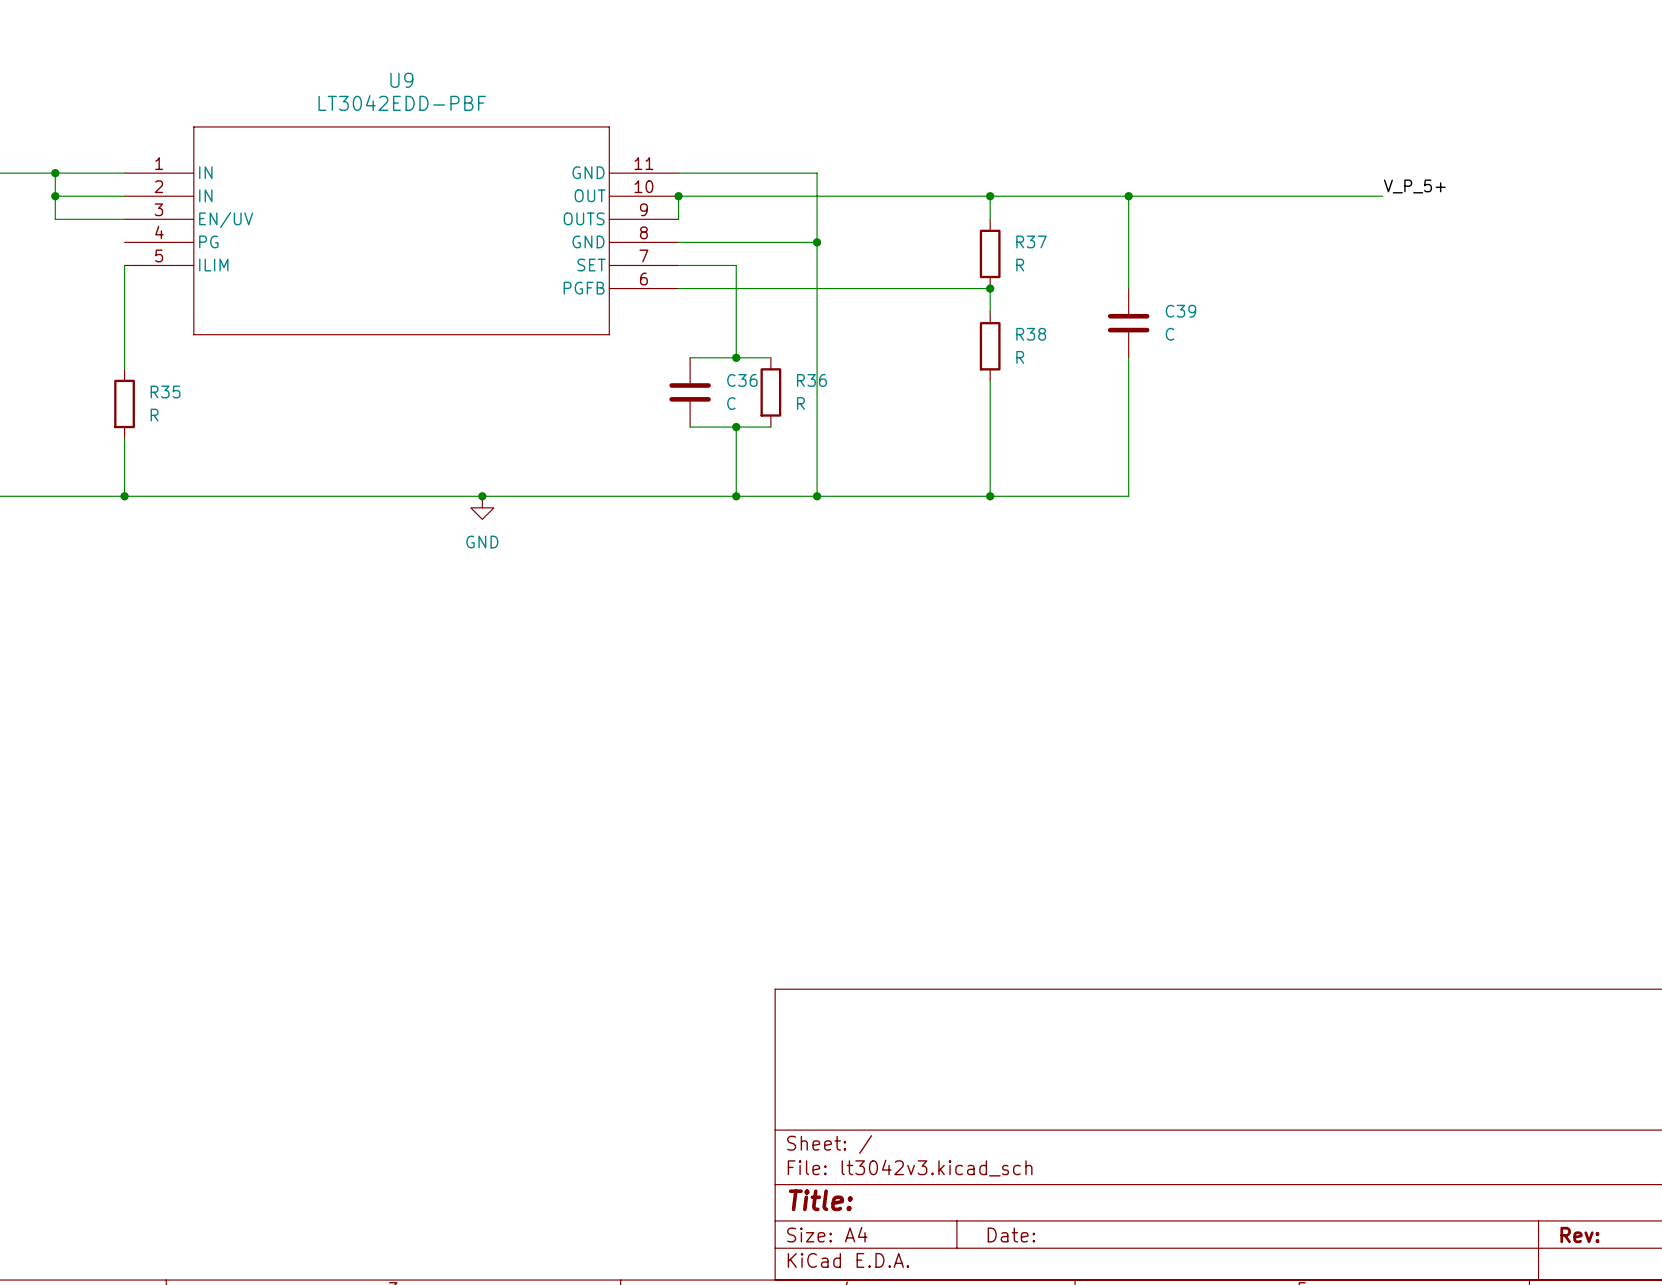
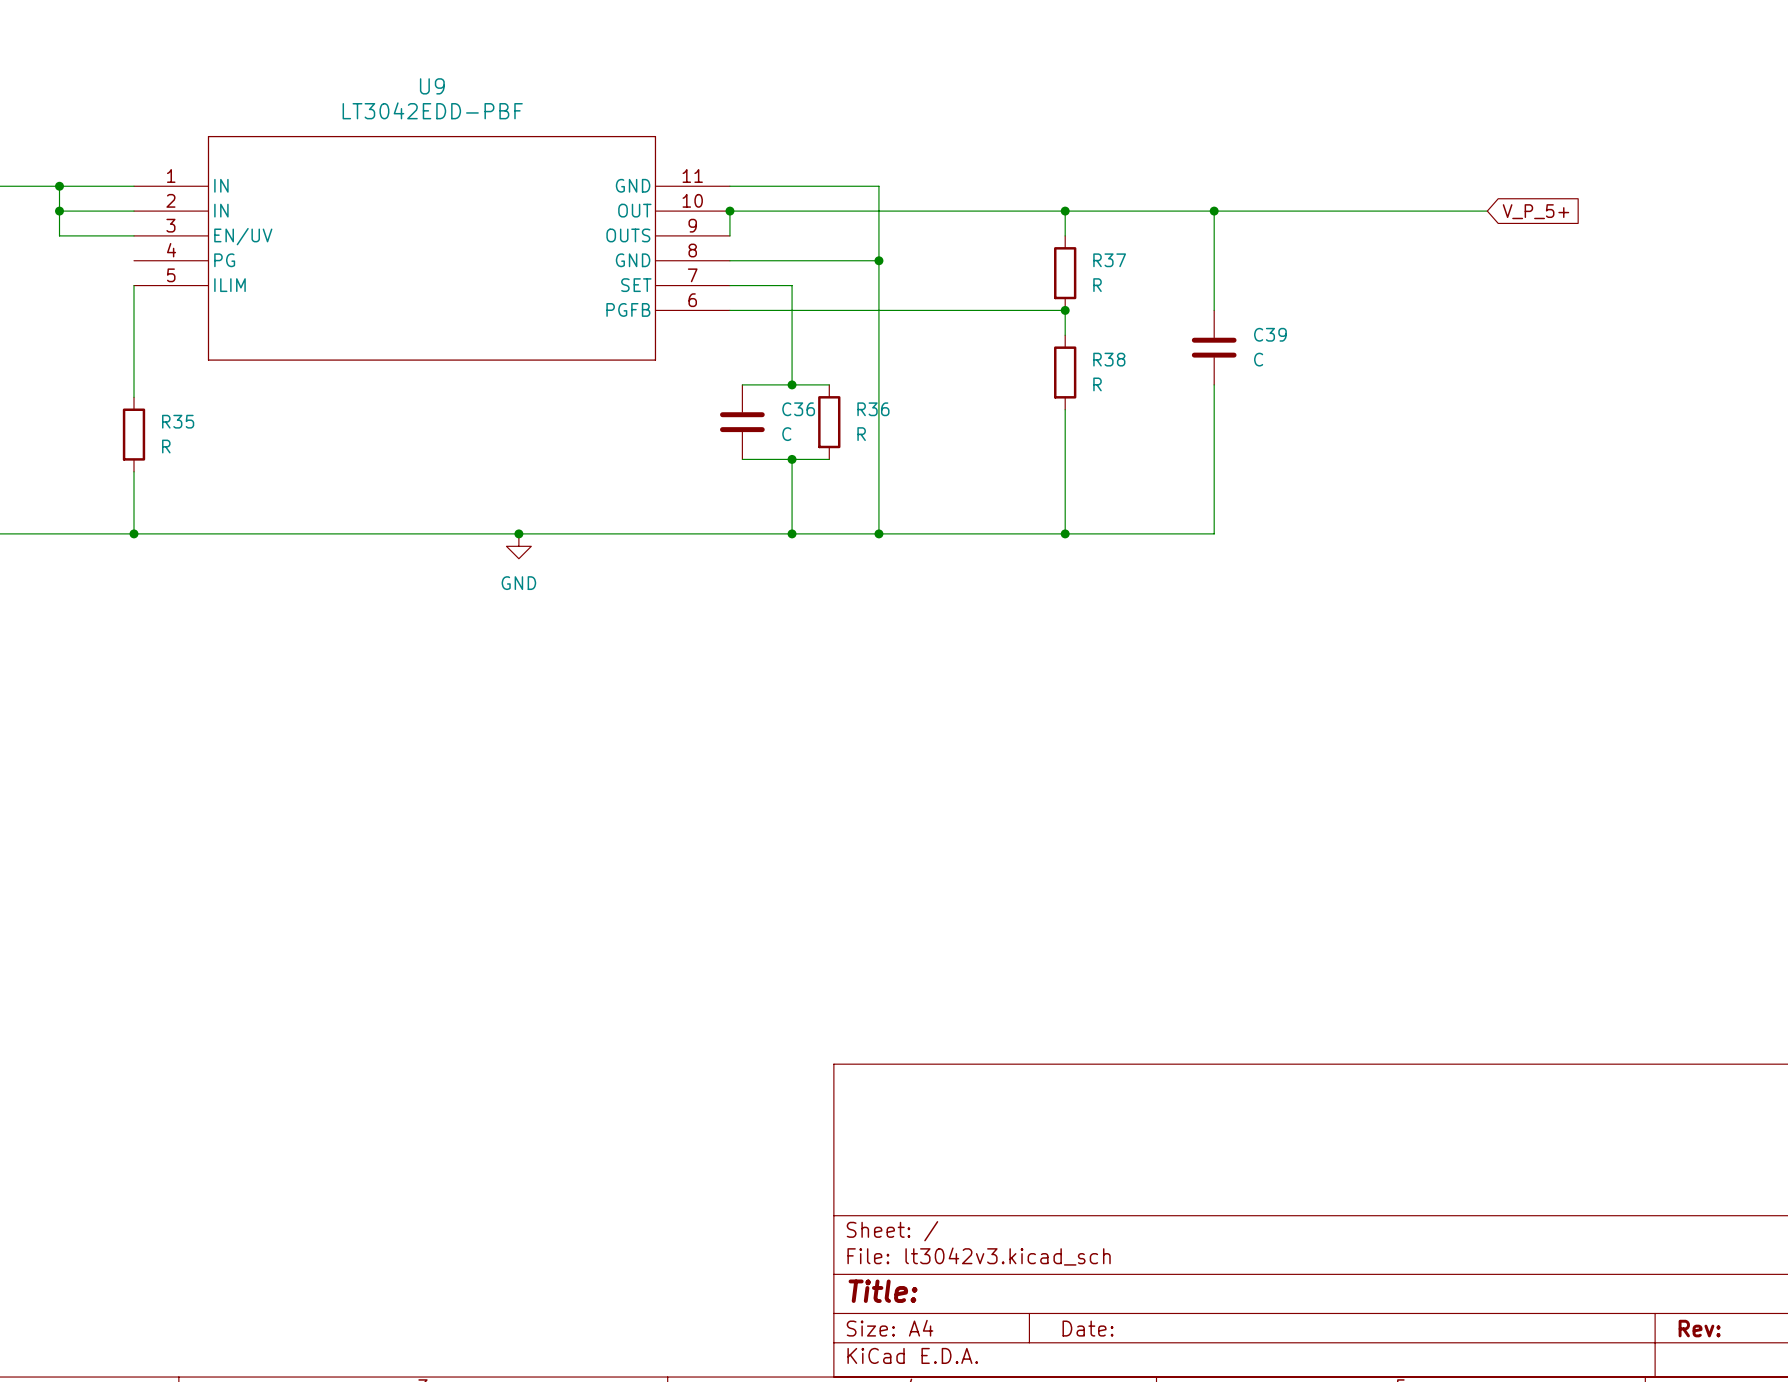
label: V_P_5+ (1414, 186) -> none
global label: none -> V_P_5+ (1535, 211)

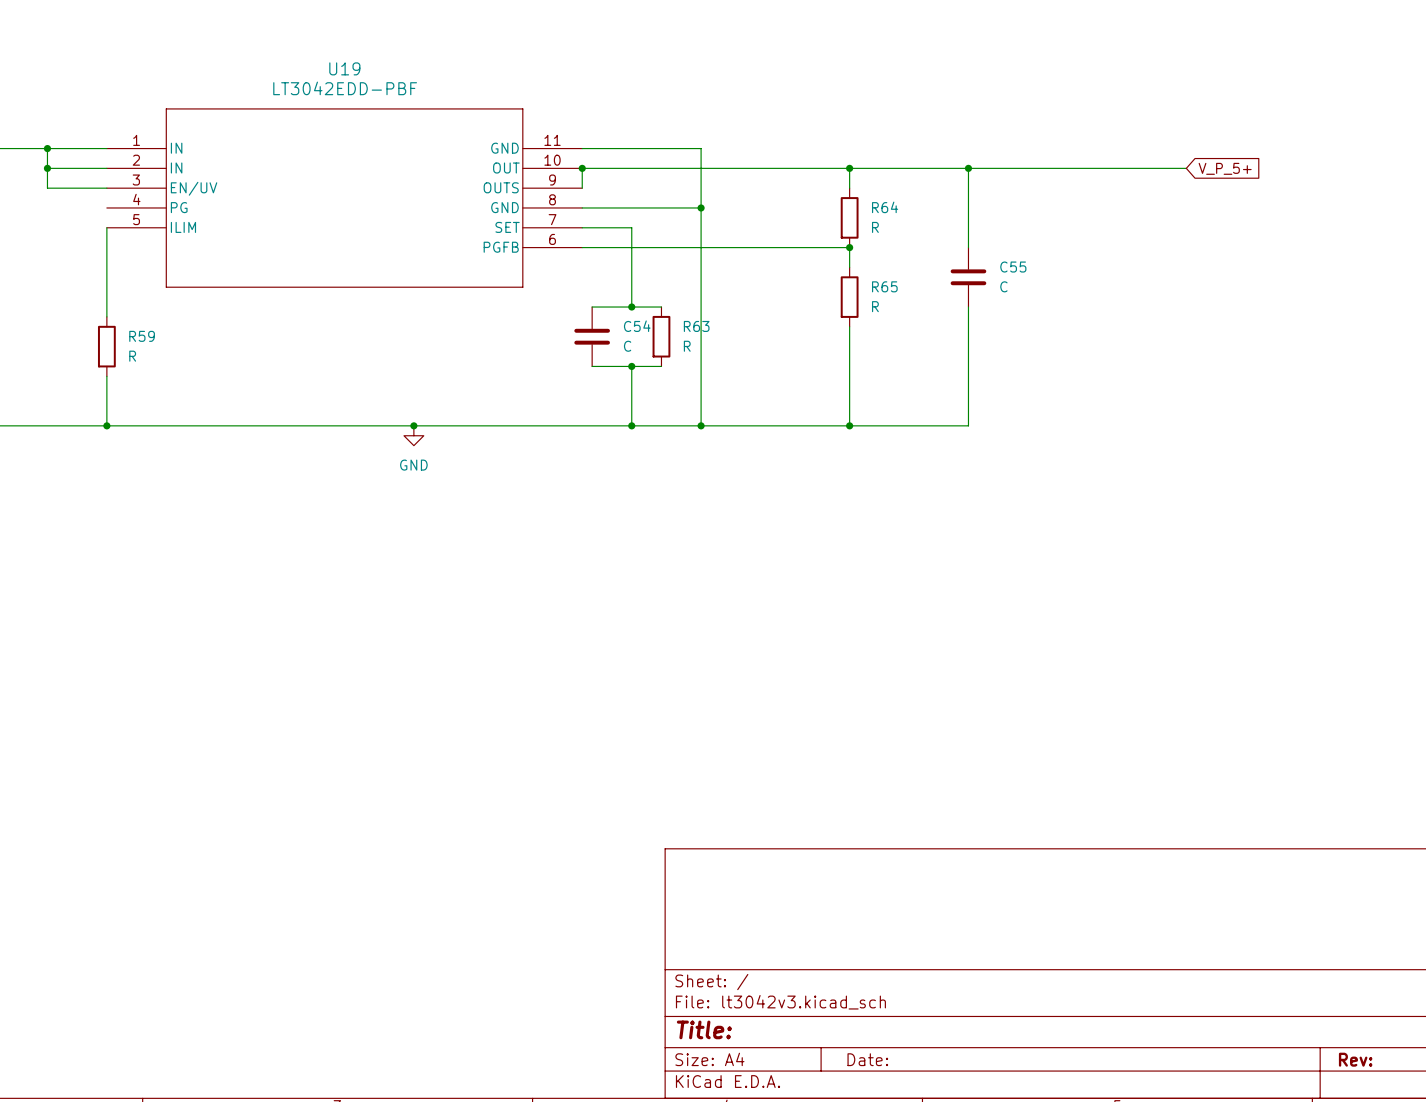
U9 name: U9 (432, 86) -> U19 (344, 68)
R37 name: R37 (1109, 260) -> R64 (885, 207)
C39 name: C39 (1270, 334) -> C55 (1013, 267)
R38 name: R38 (1109, 359) -> R65 (884, 286)
C36 name: C36 (798, 409) -> C54 (637, 326)
R36 name: R36 (873, 409) -> R63 (696, 326)
R35 name: R35 (178, 421) -> R59 (142, 336)

